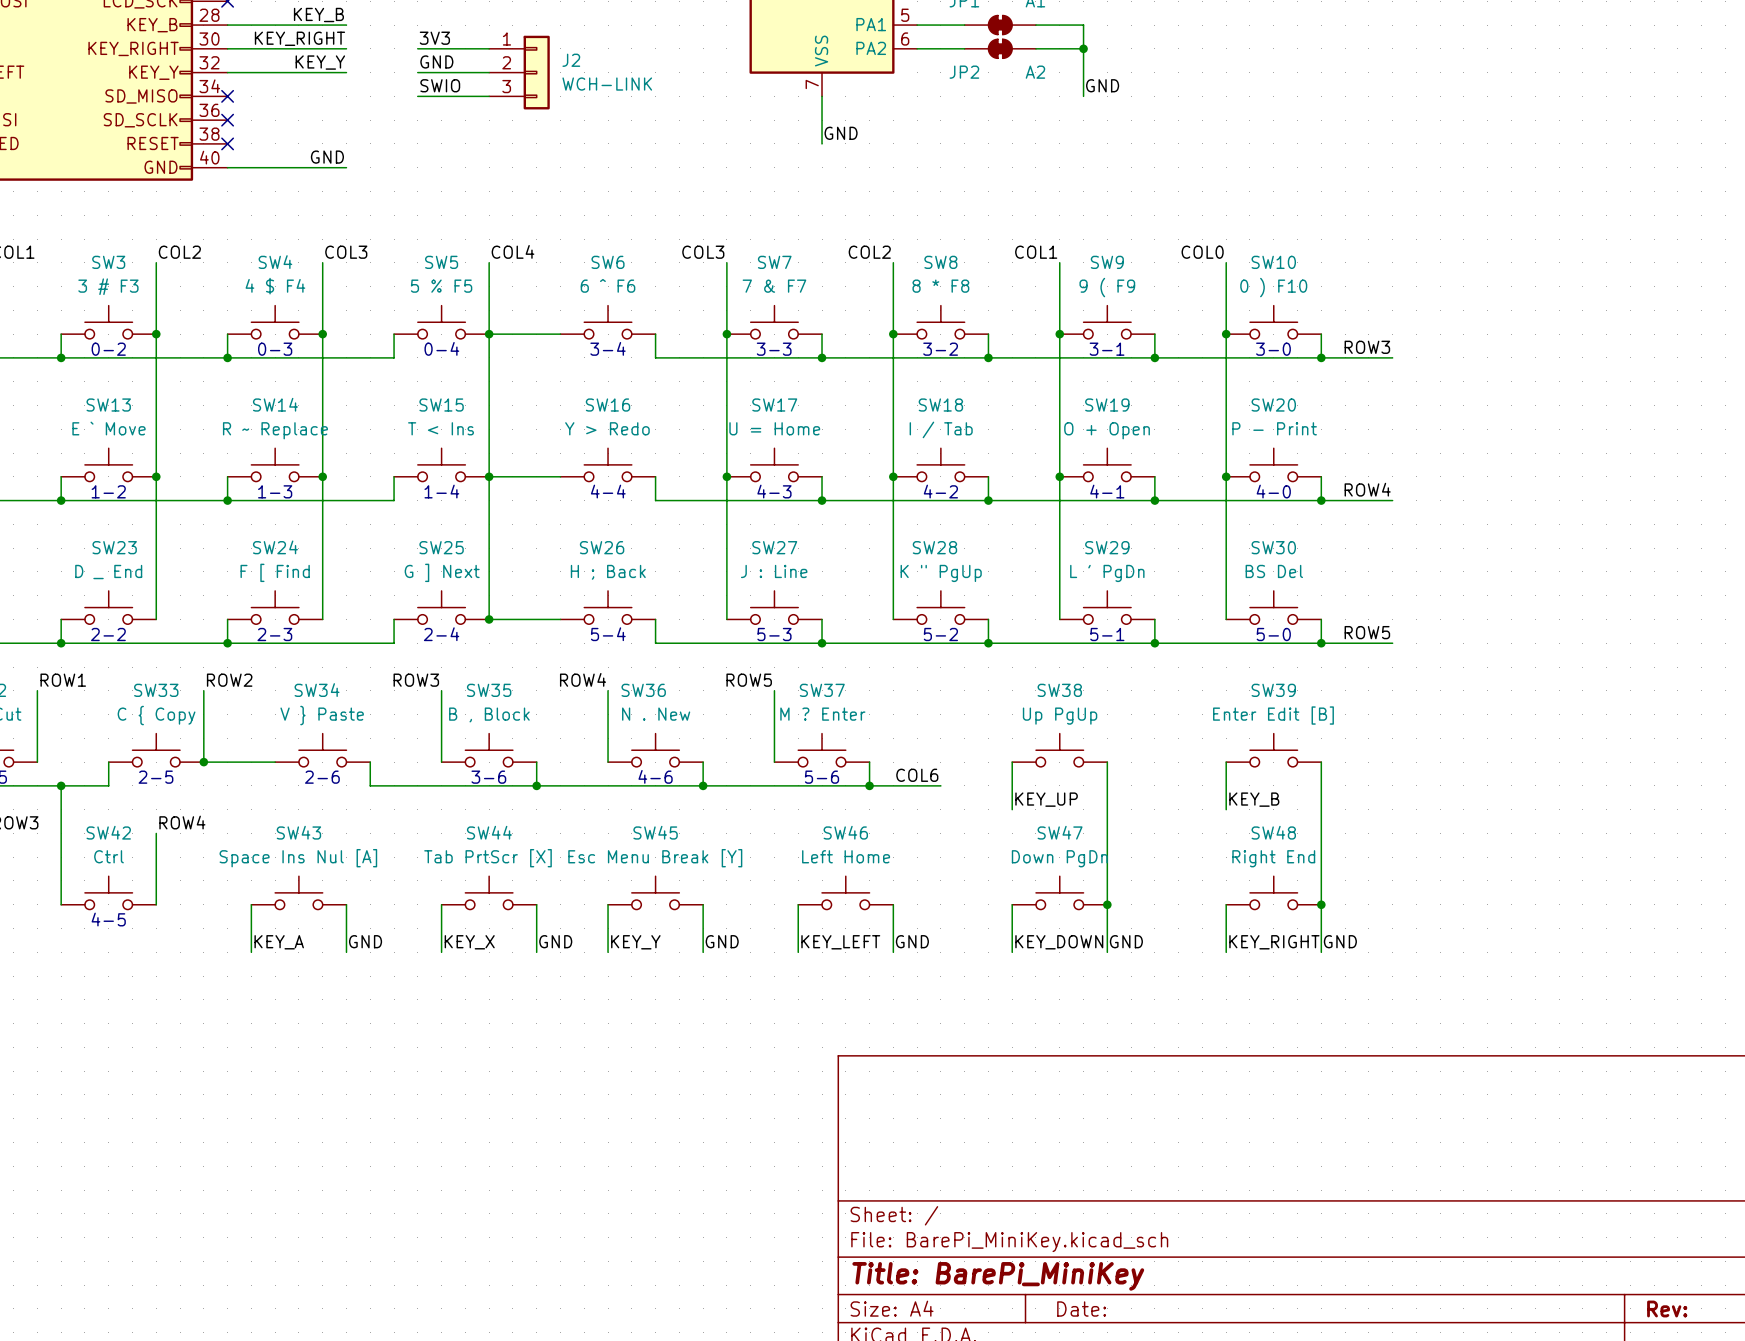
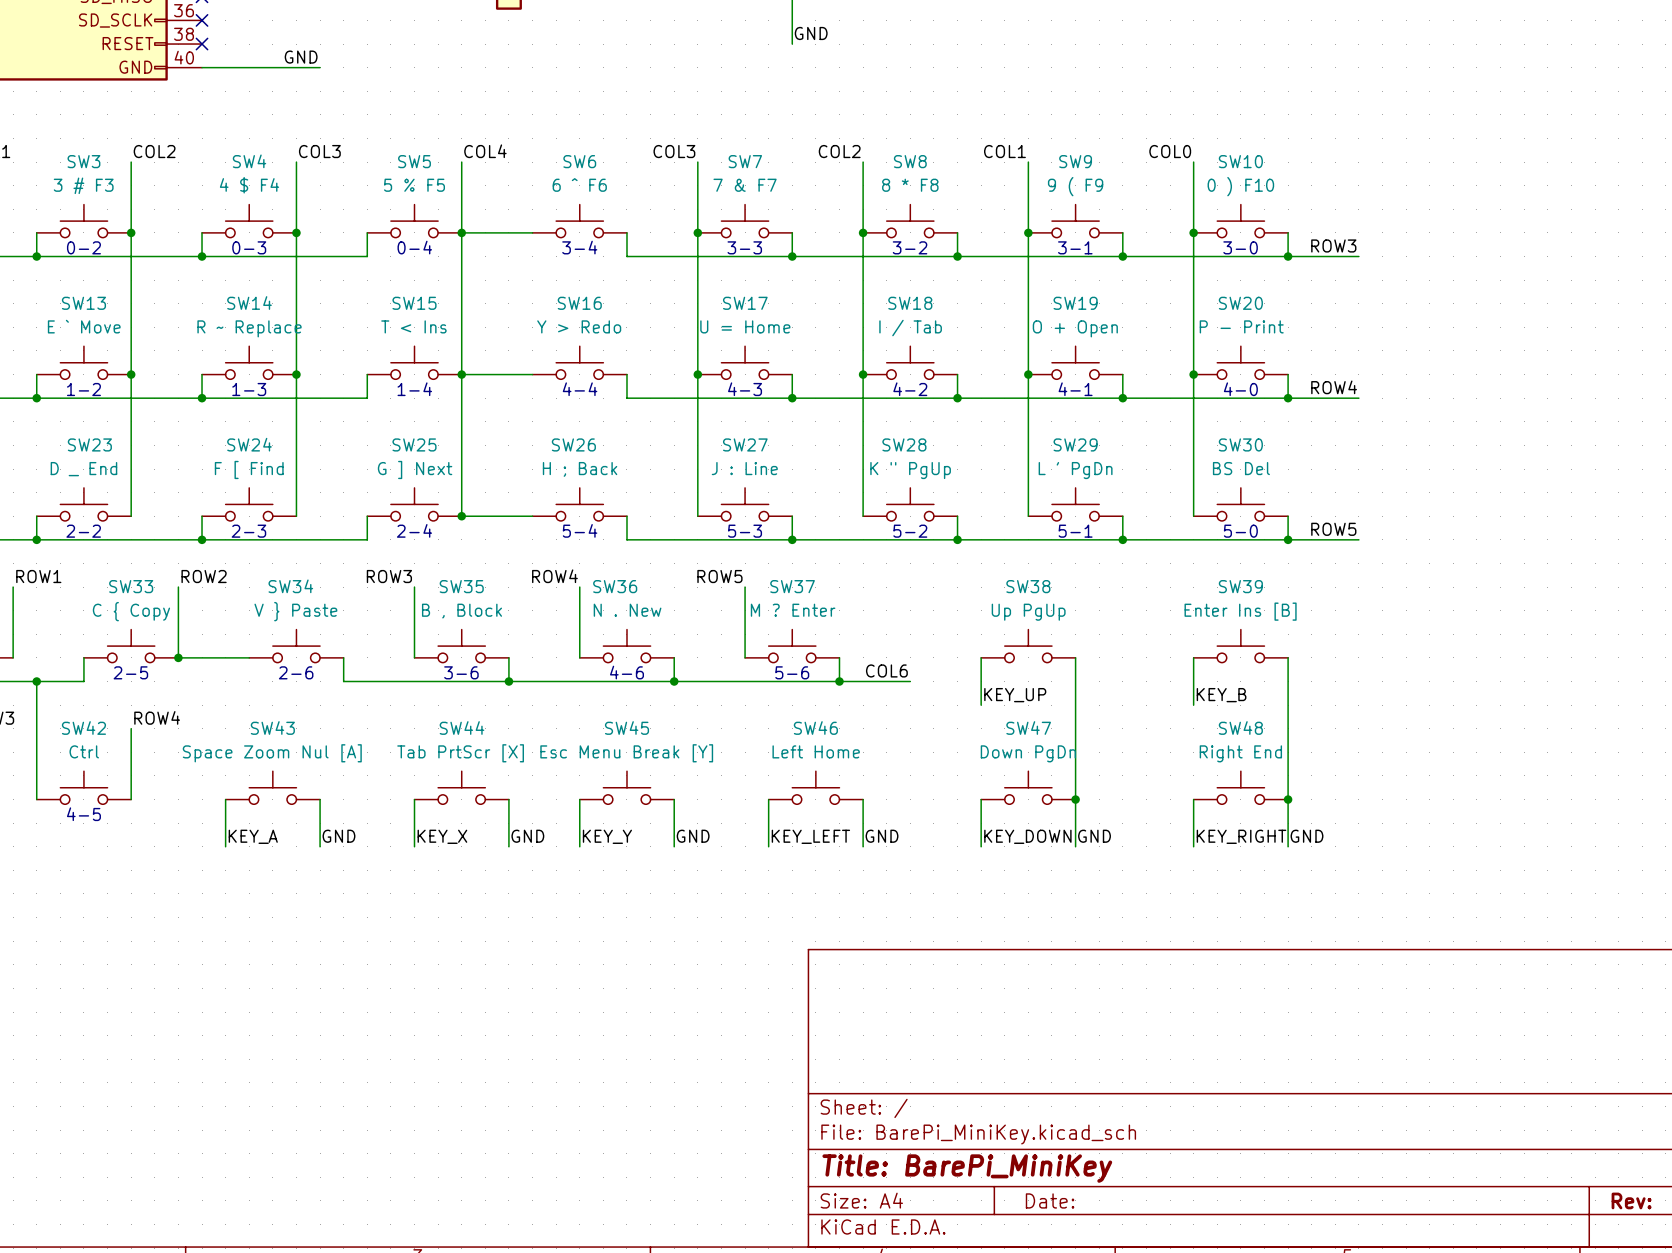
SW39 value: Enter Edit [B] (1273, 715) -> Enter Ins [B] (1240, 611)
SW43 value: Space Ins Nul [A] (298, 858) -> Space Zoom Nul [A] (272, 753)

